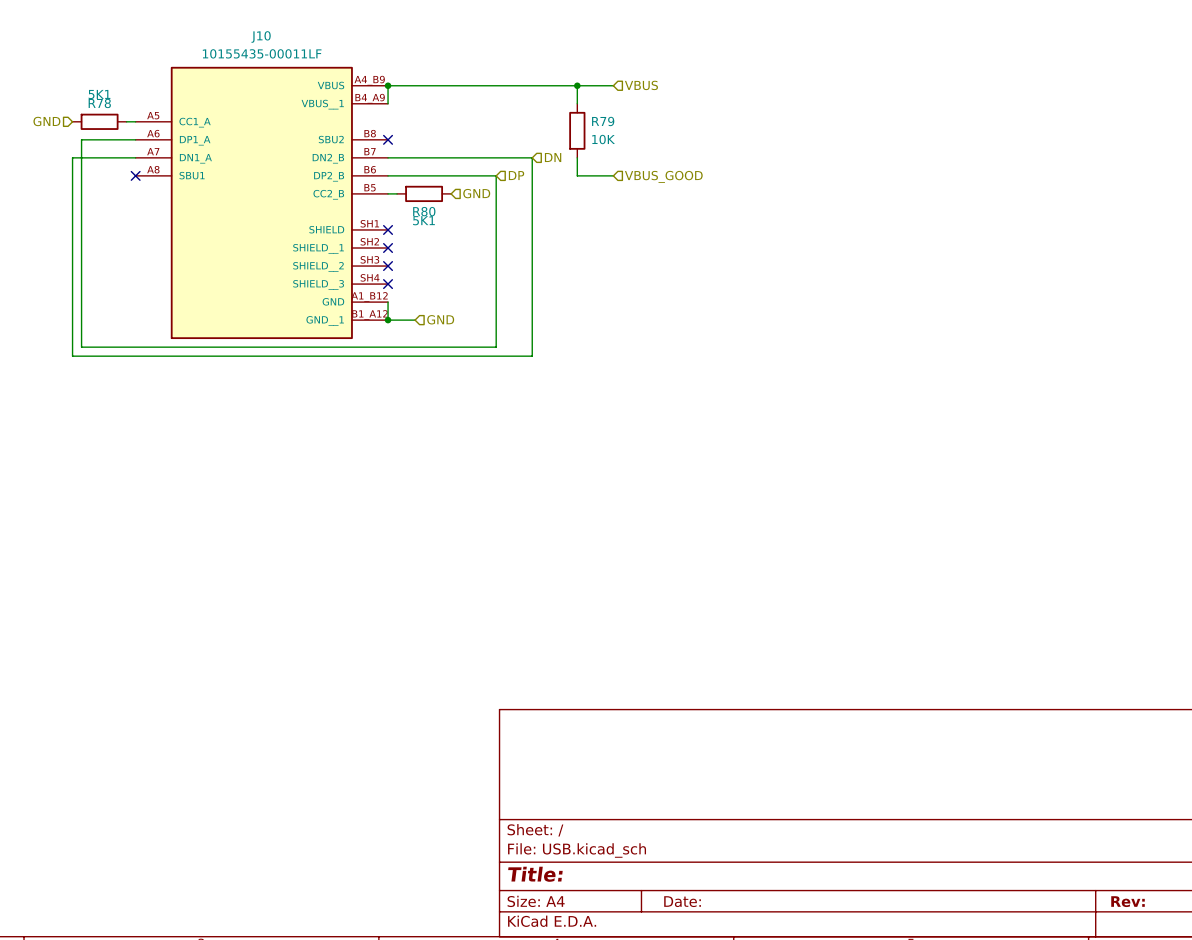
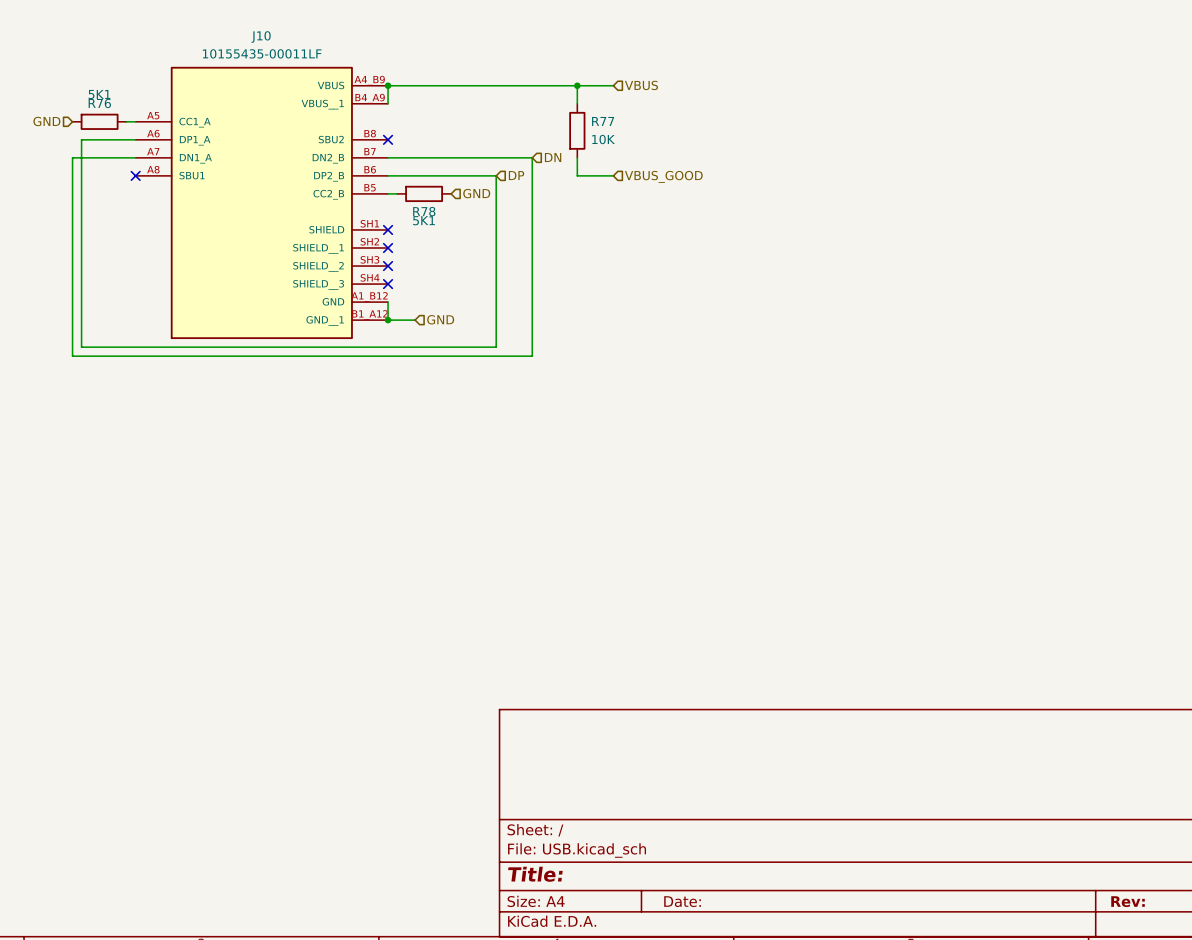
R78 name: R78 (99, 103) -> R76 (99, 103)
R79 name: R79 (603, 121) -> R77 (603, 121)
R80 name: R80 (424, 211) -> R78 (424, 211)

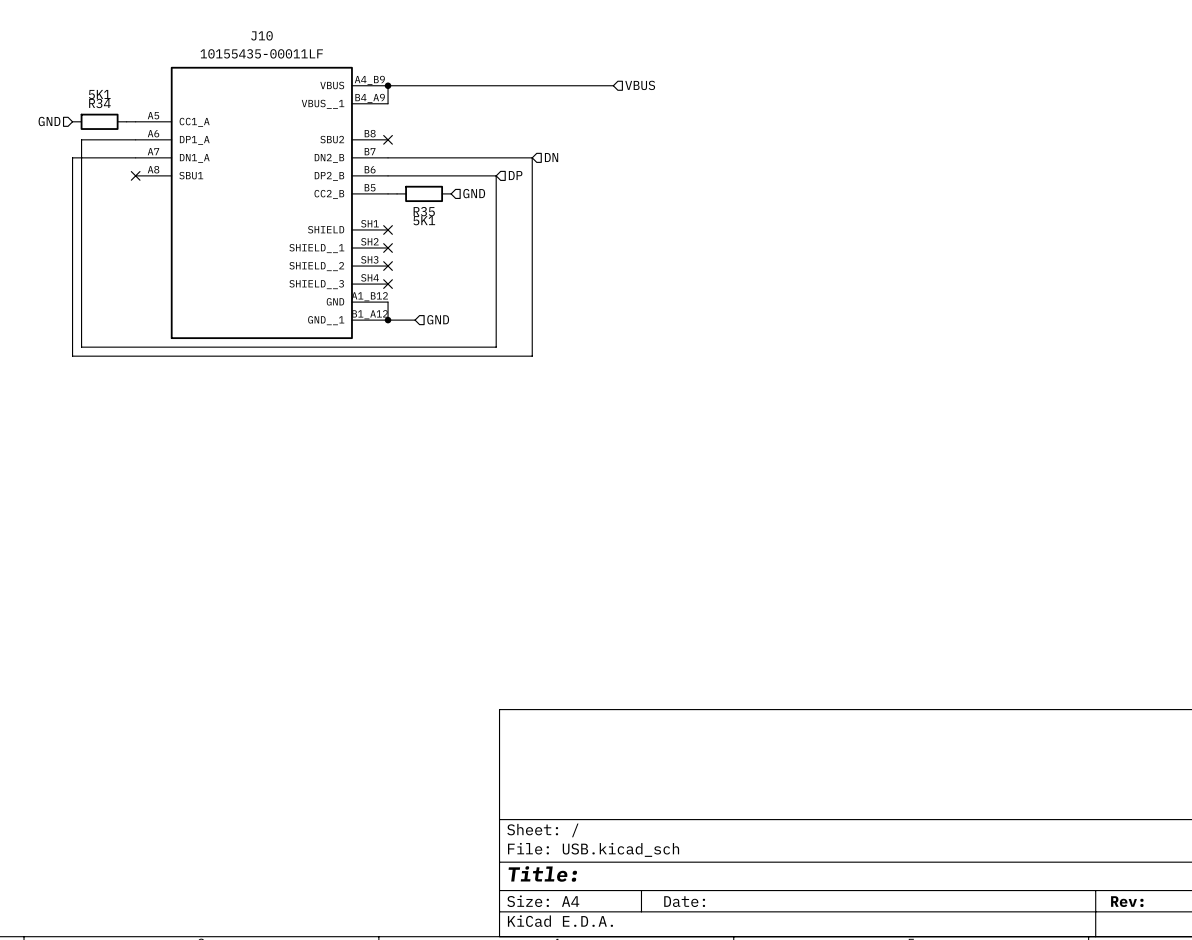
wire: (577, 85) (577, 103) -> none
junction: (577, 85) -> none
R76 name: R76 (99, 103) -> R34 (99, 103)
R77: 10K (577, 130) -> none
wire: (577, 157) (577, 175) (613, 175) -> none
hierarchical label: VBUS_GOOD (663, 176) -> none
R78 name: R78 (424, 211) -> R35 (424, 211)

